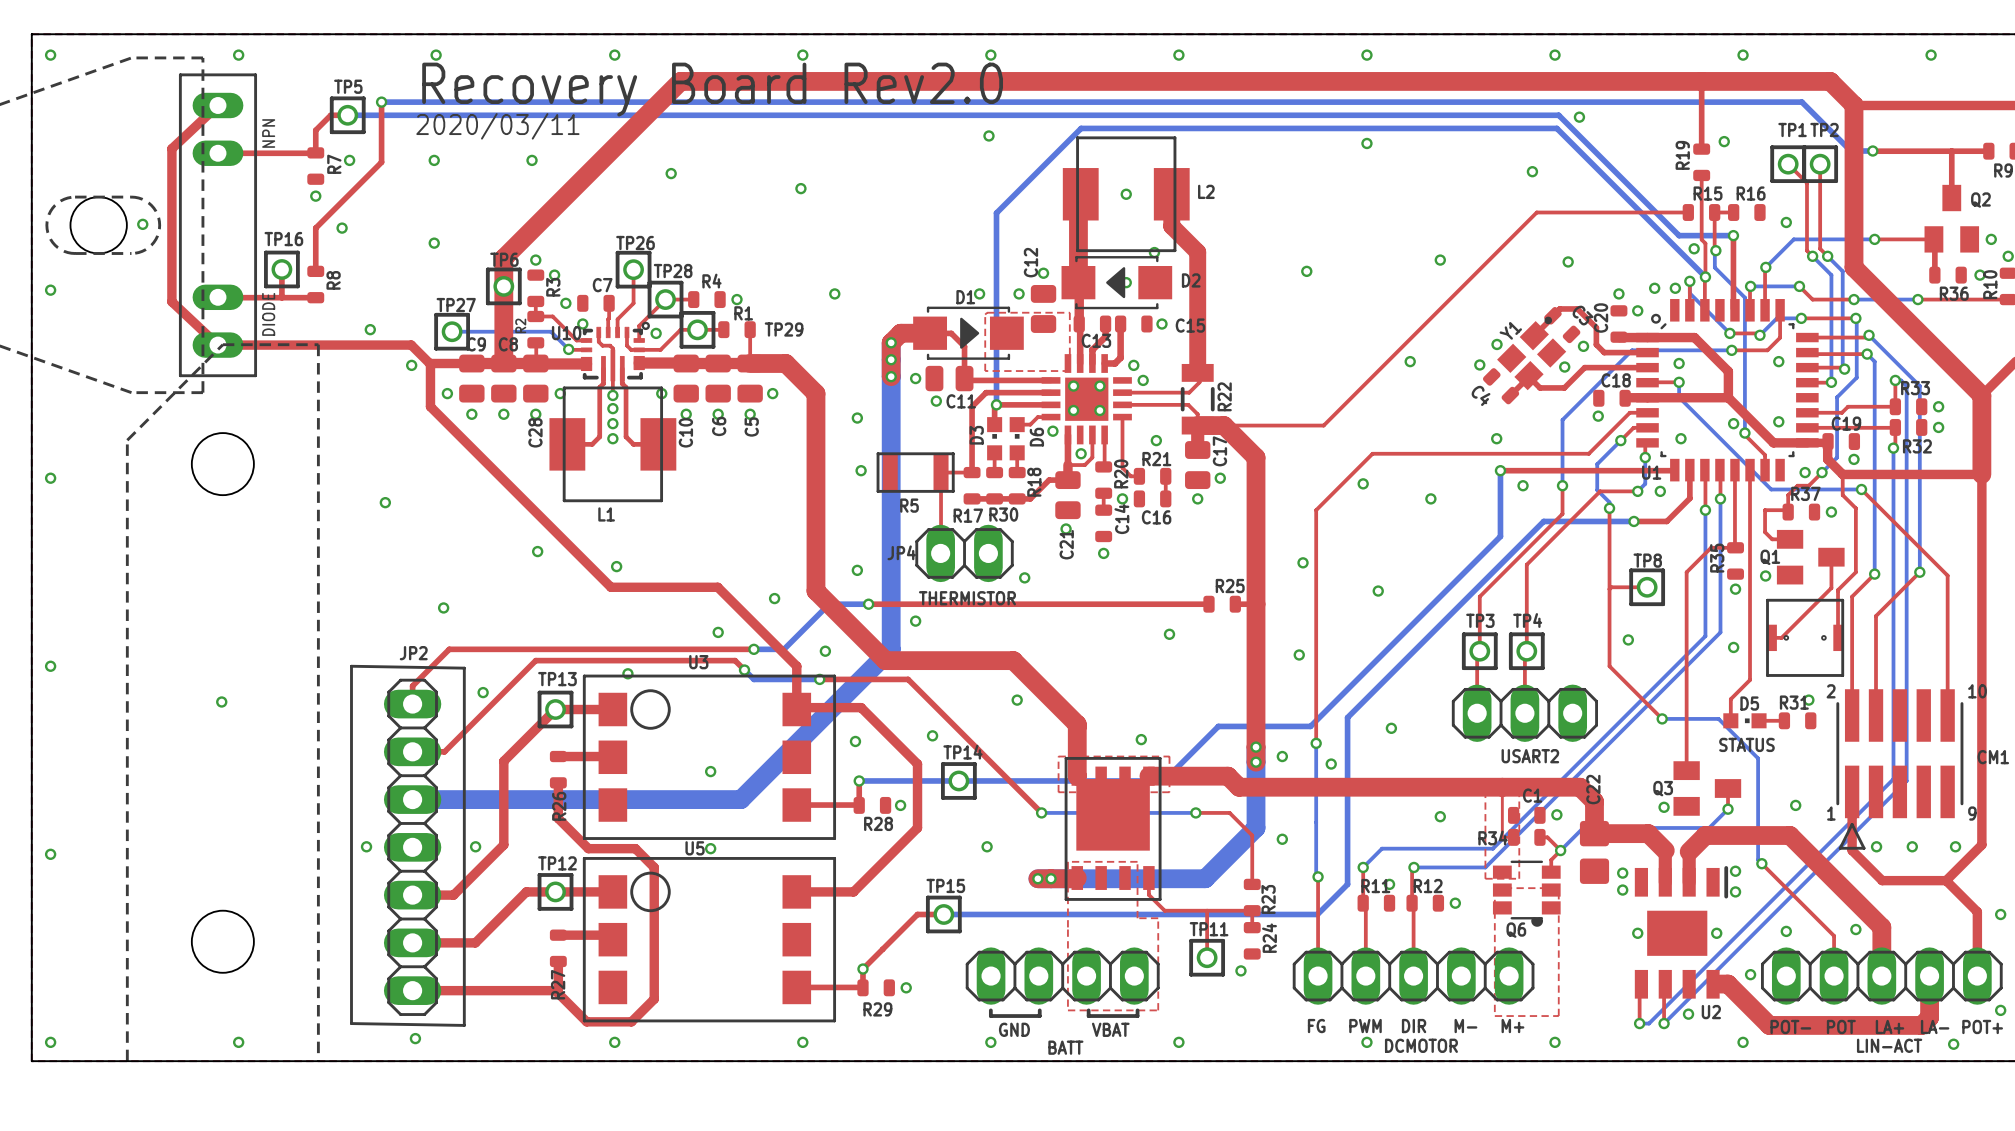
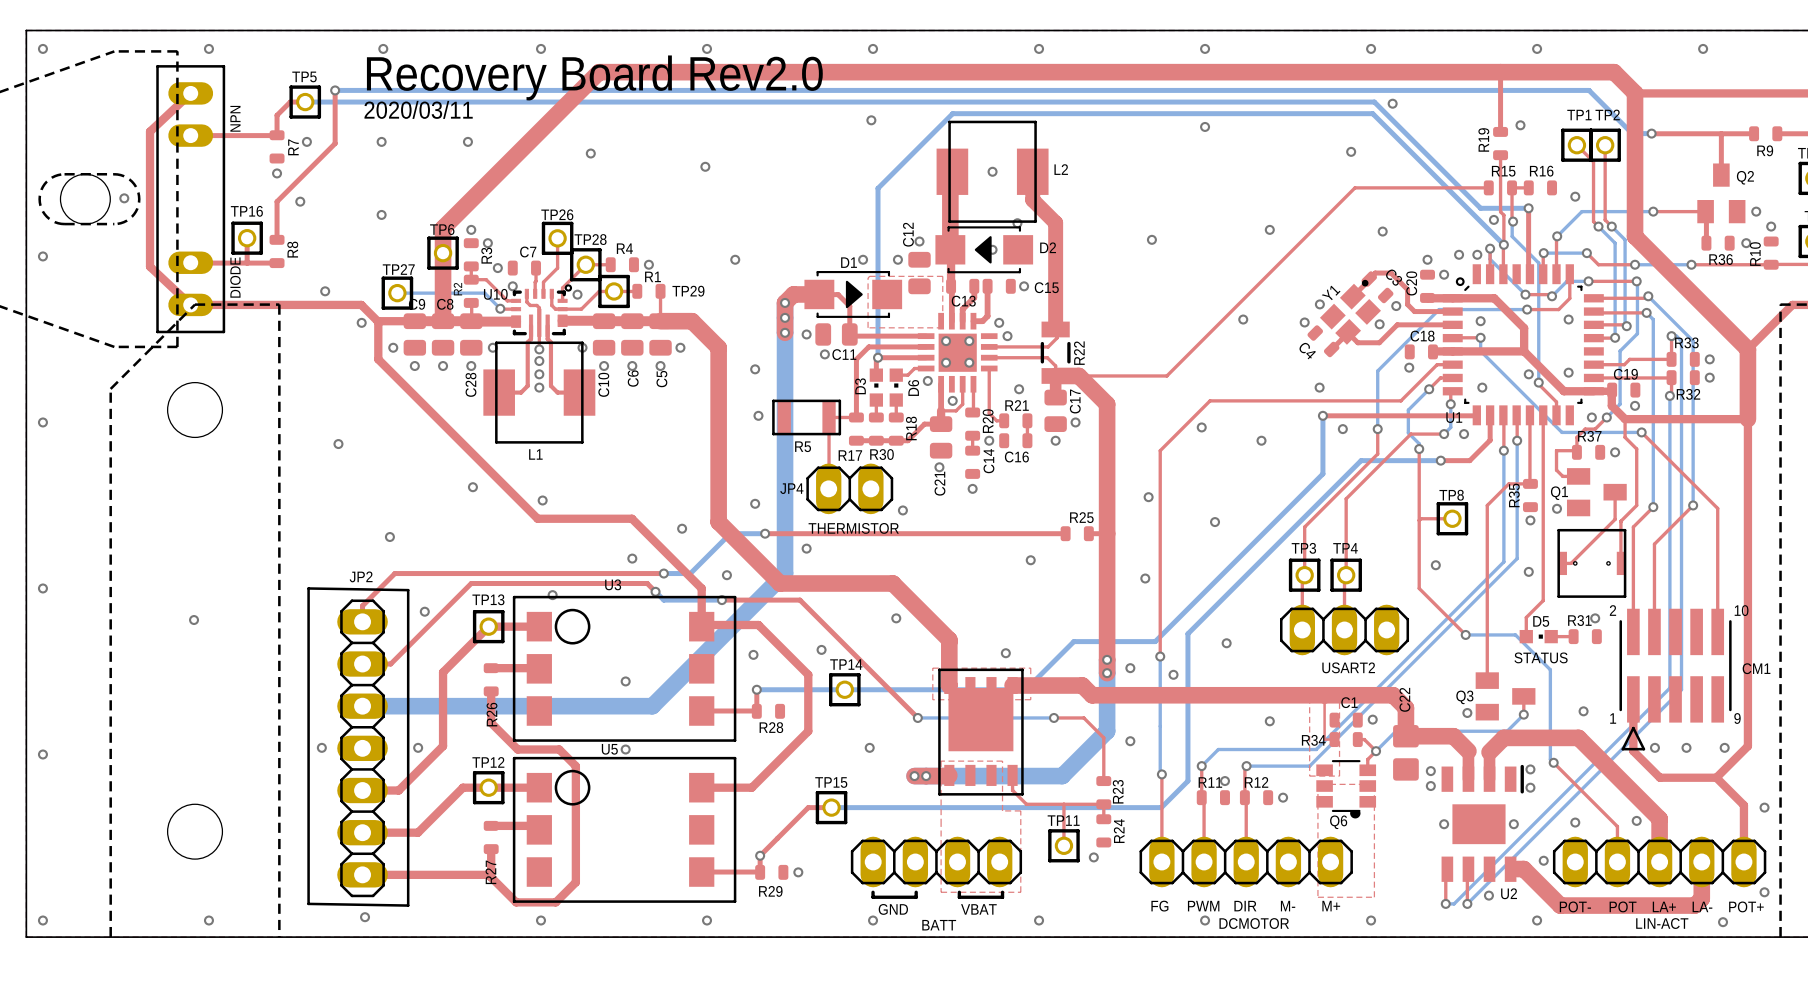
via: (900, 805) -> none

